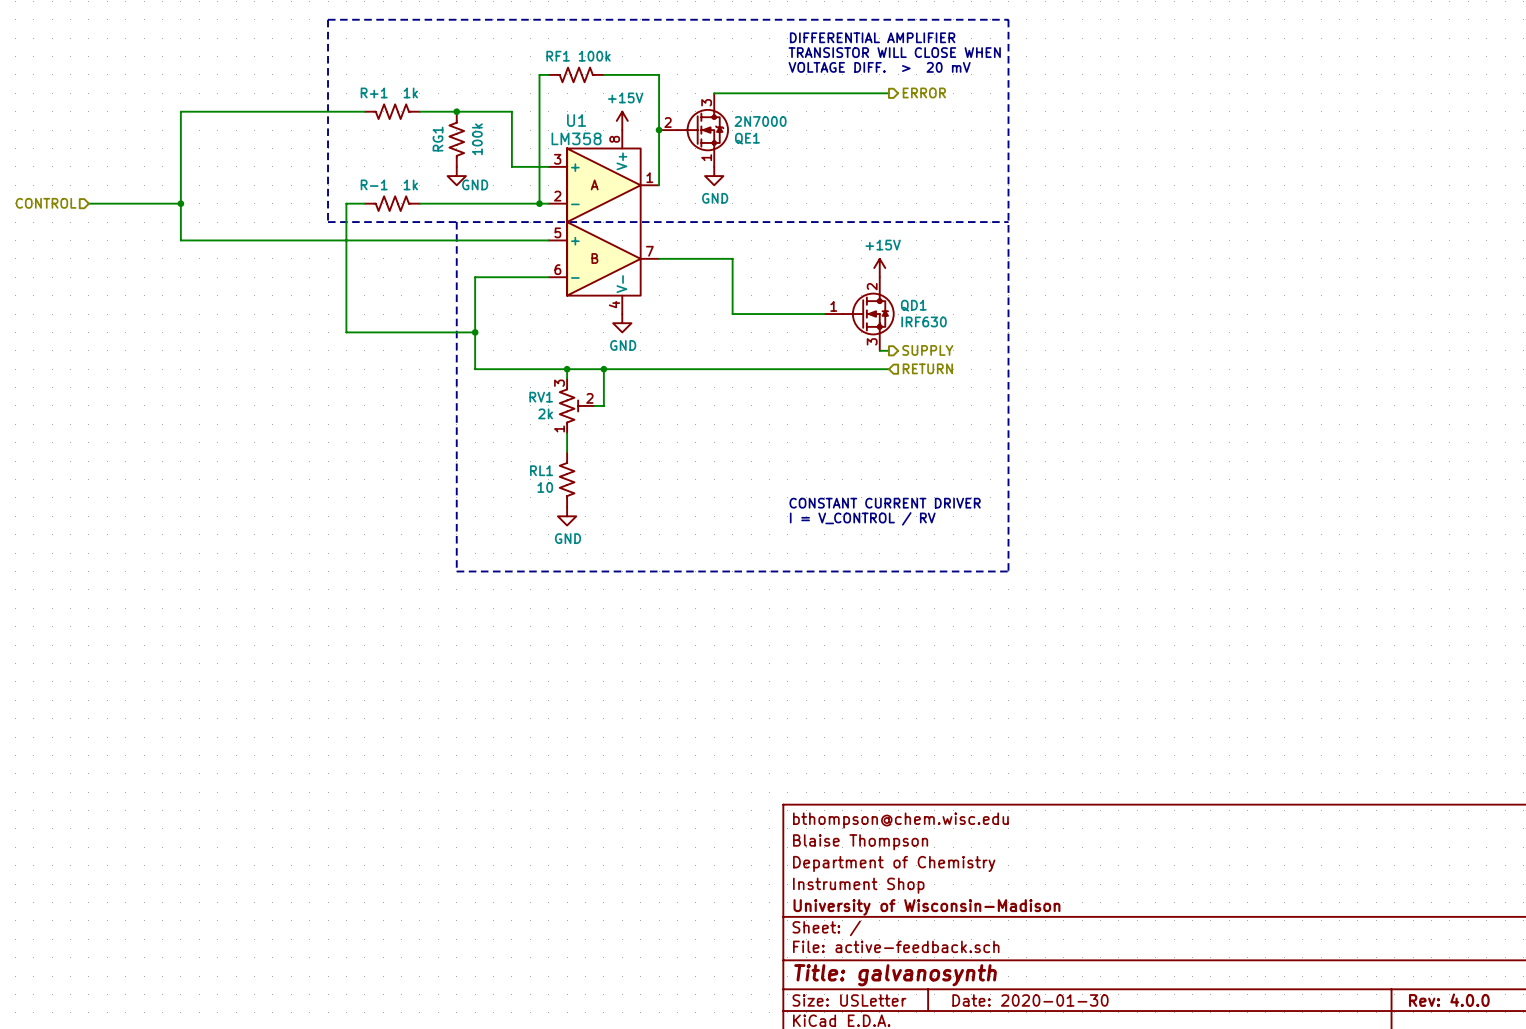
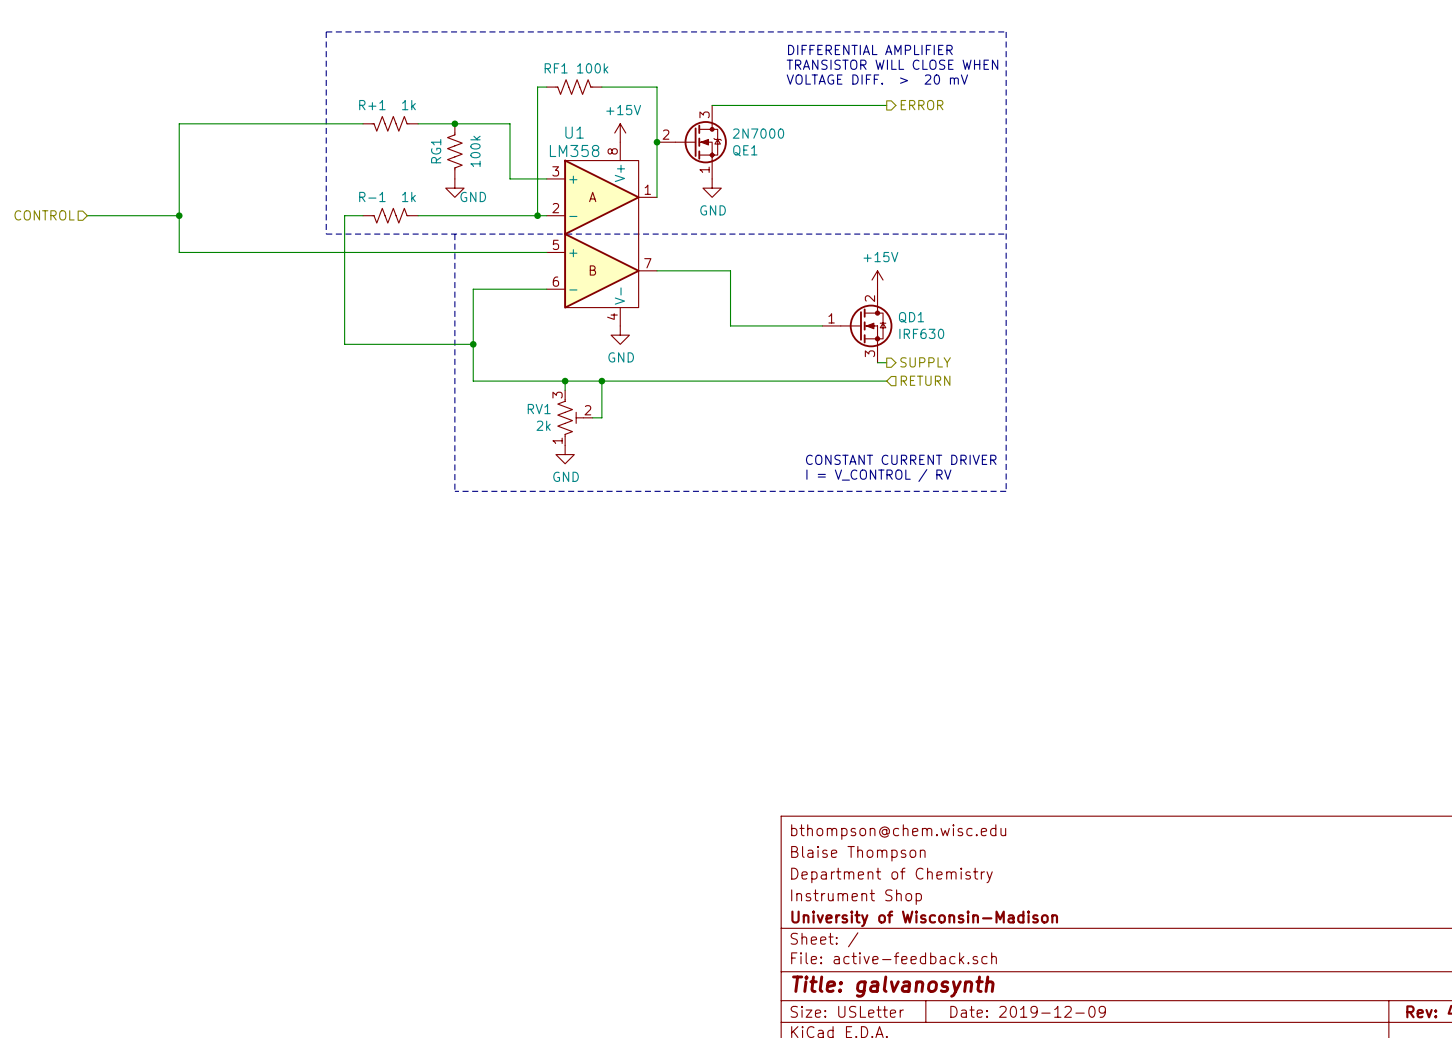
line: (456, 479) (456, 571) (1008, 571) (1008, 479) -> (454, 491) (1006, 491)
RL1: 10 (567, 479) -> none
text position: CONSTANT CURRENT DRIVER (885, 503) -> CONSTANT CURRENT DRIVER (901, 459)
power symbol position: GND (567, 516) -> GND (565, 454)
text position: I = V_CONTROL / RV (862, 518) -> I = V_CONTROL / RV (878, 475)
title block: Date: 2020-01-30 (1030, 1000) -> Date: 2019-12-09 (1028, 1011)

